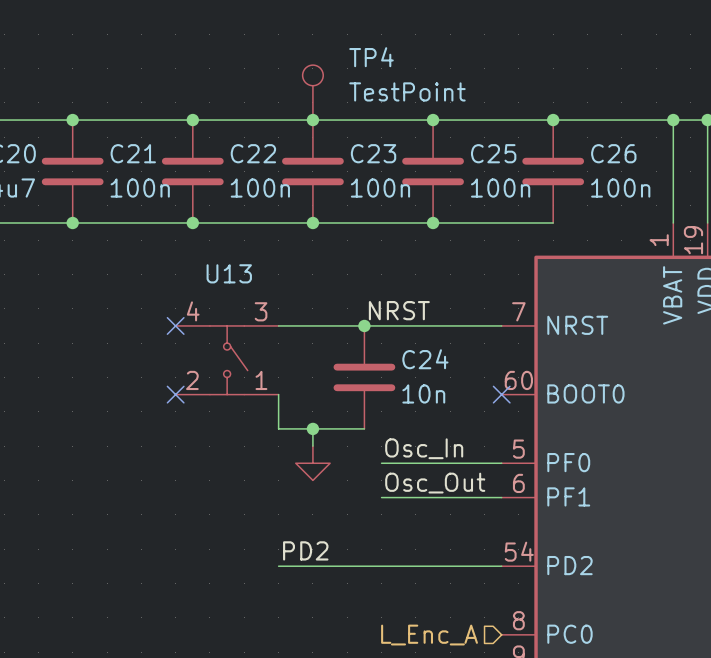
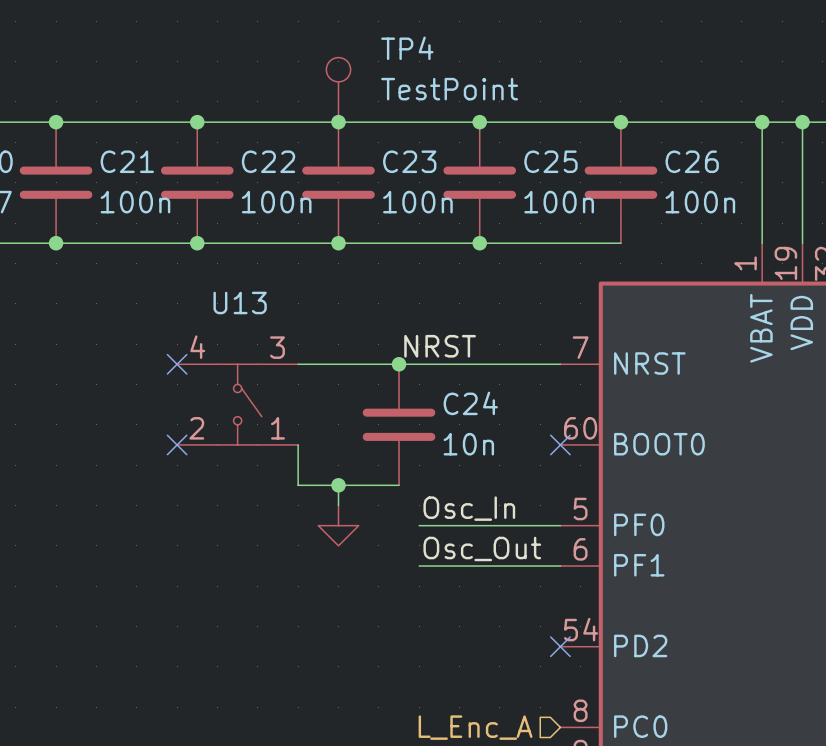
label: PD2 (305, 550) -> none
wire: (278, 566) (501, 566) -> none
no-connect mark: none -> (560, 646)

